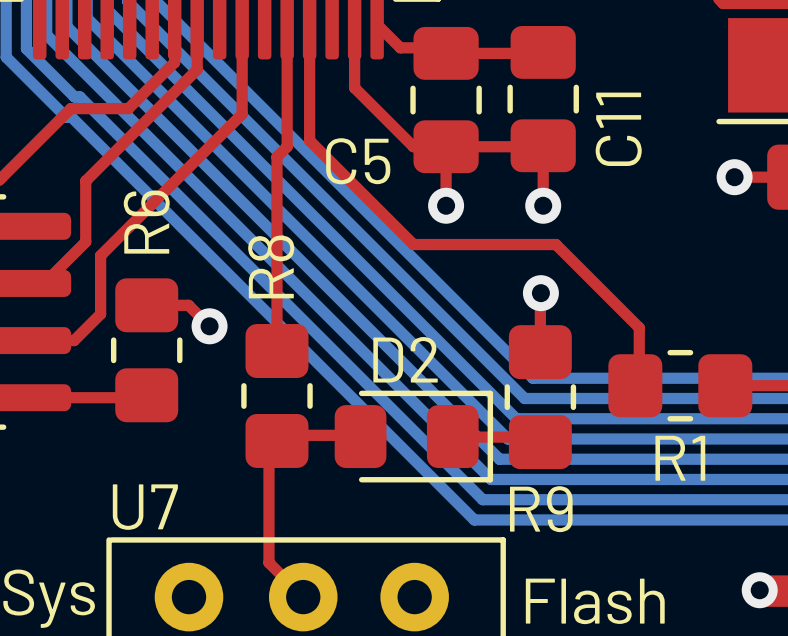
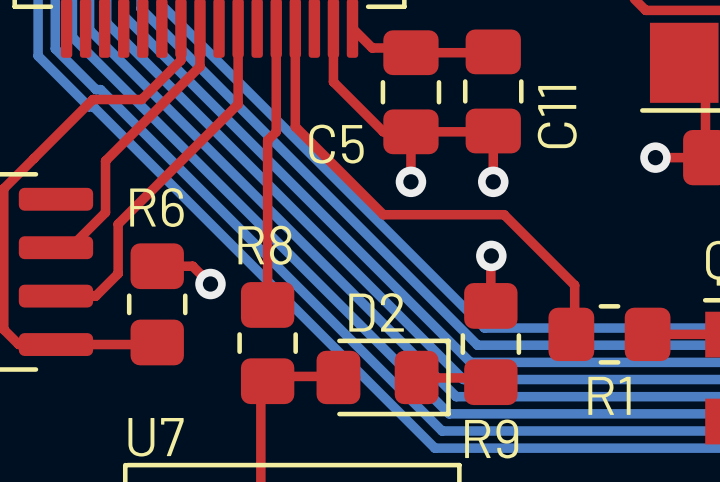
R6 name rotation: 0° (146, 222) -> 90° clockwise (156, 207)
R8 name rotation: 0° (271, 266) -> 90° clockwise (265, 245)

